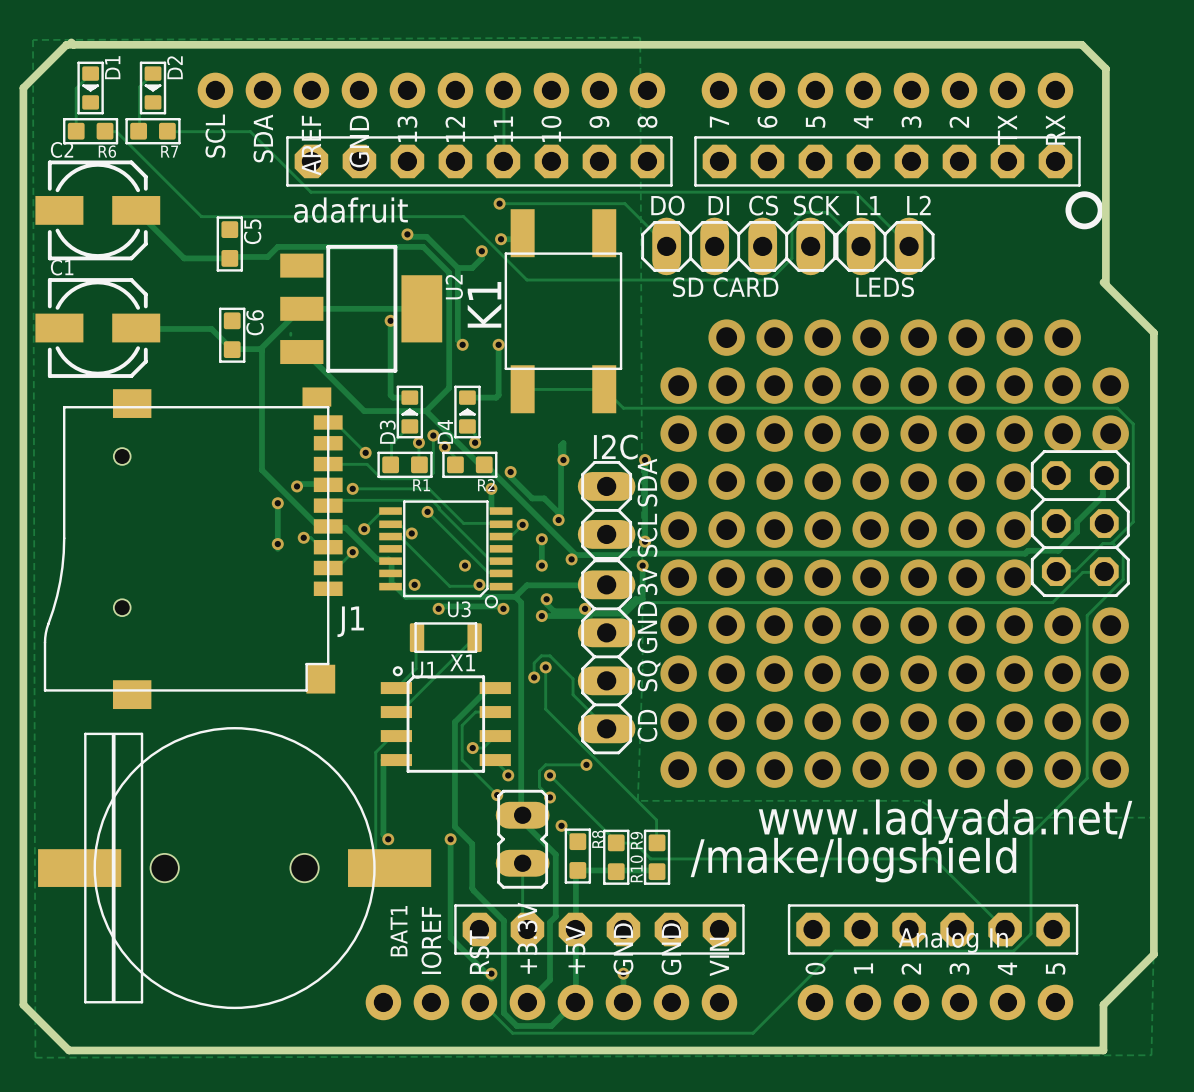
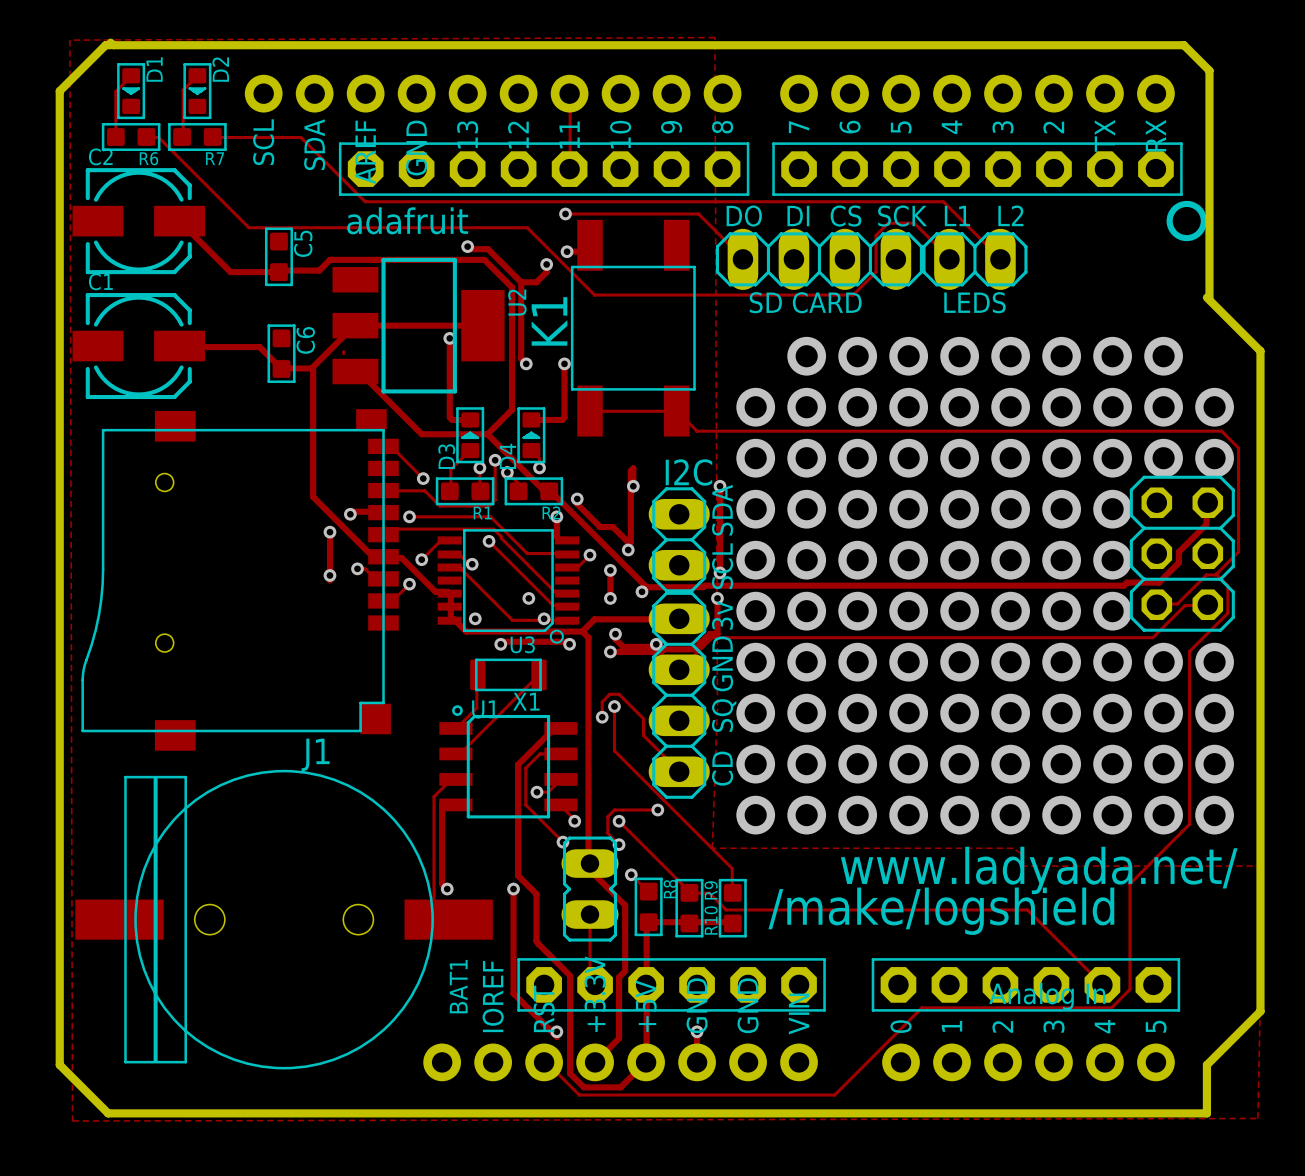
J1 name position: J1 (350, 621) -> J1 (315, 754)

